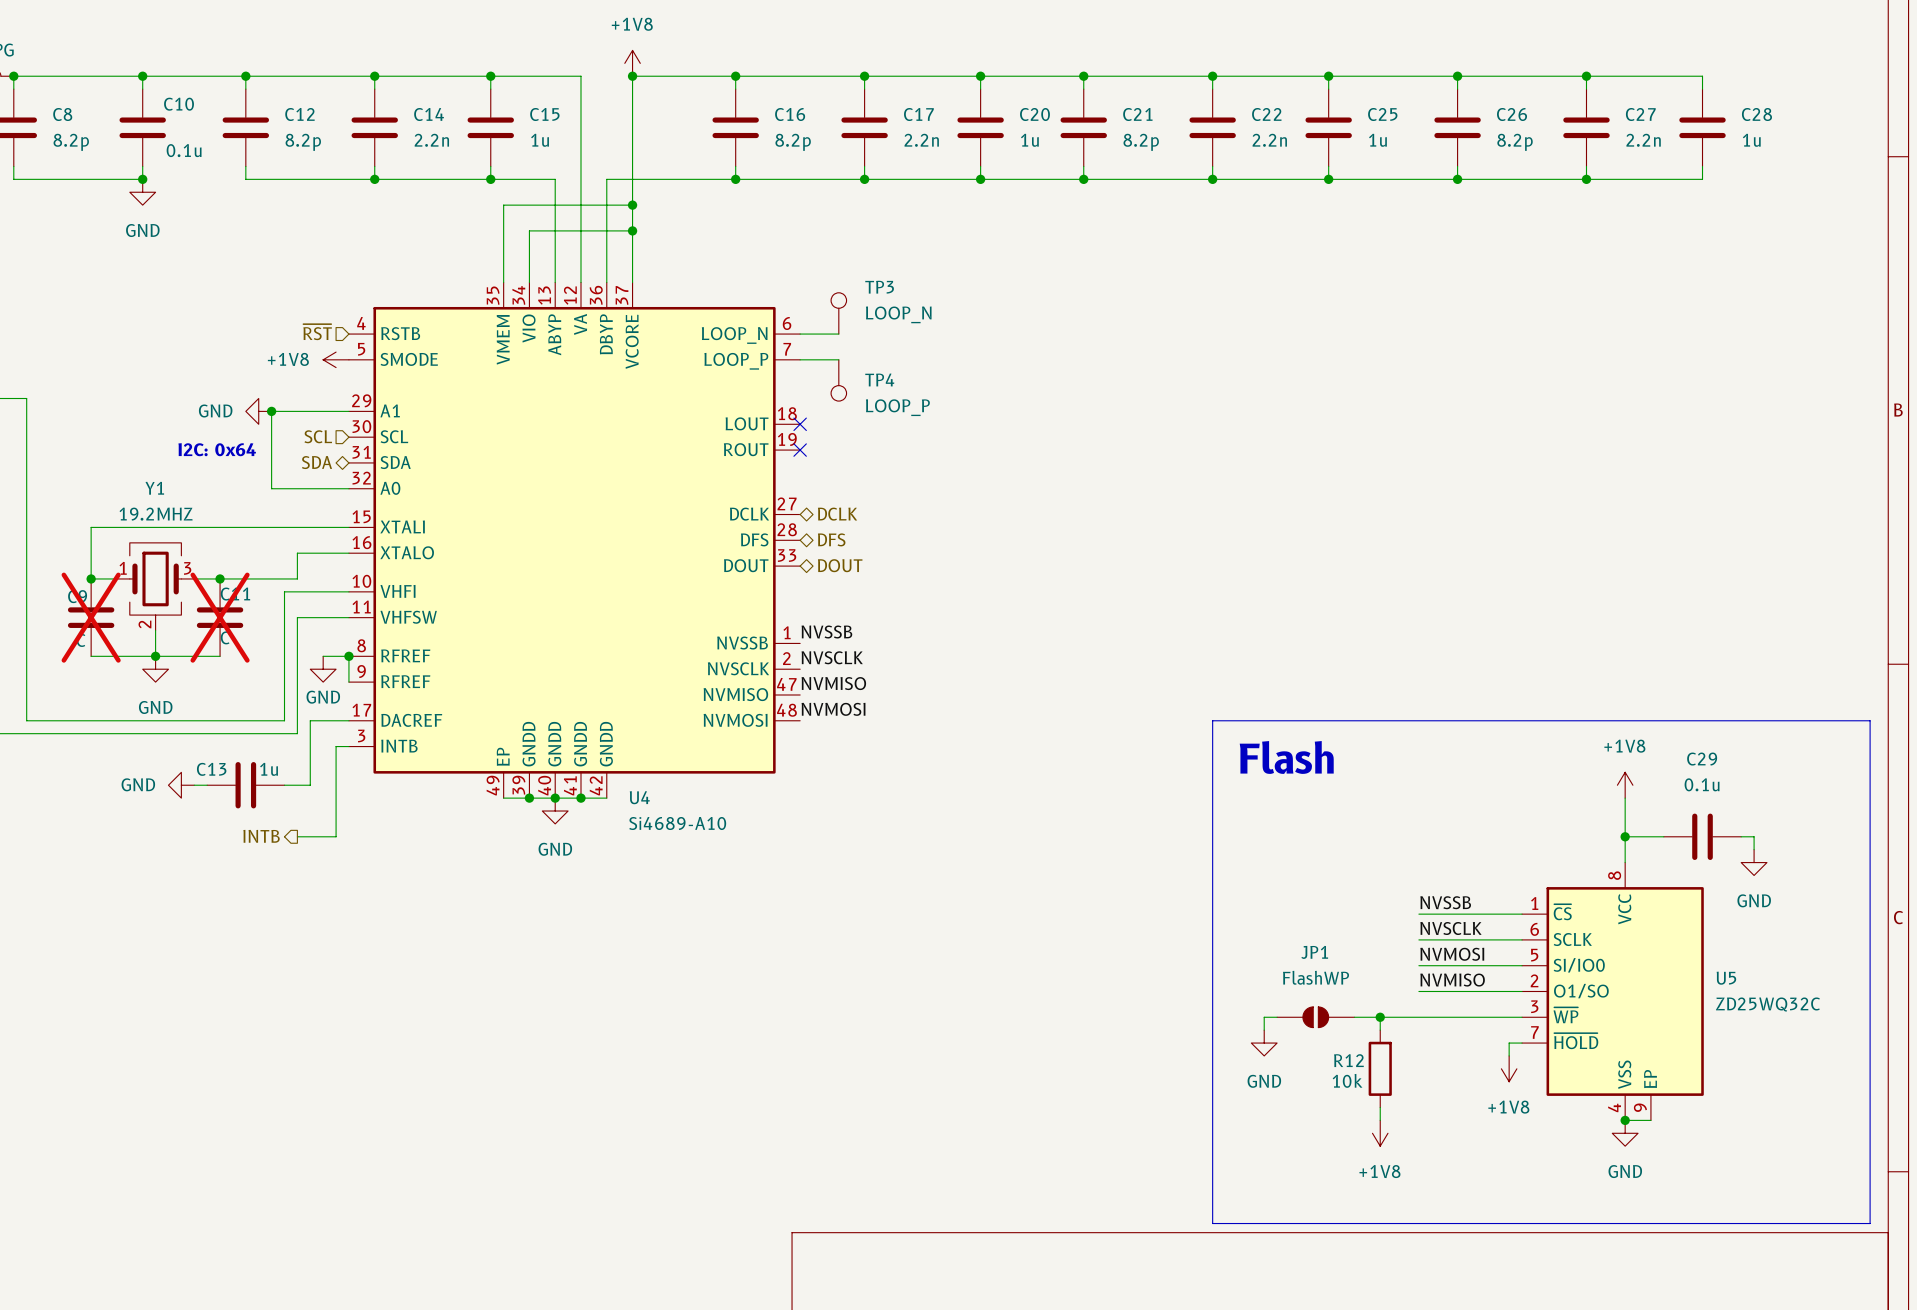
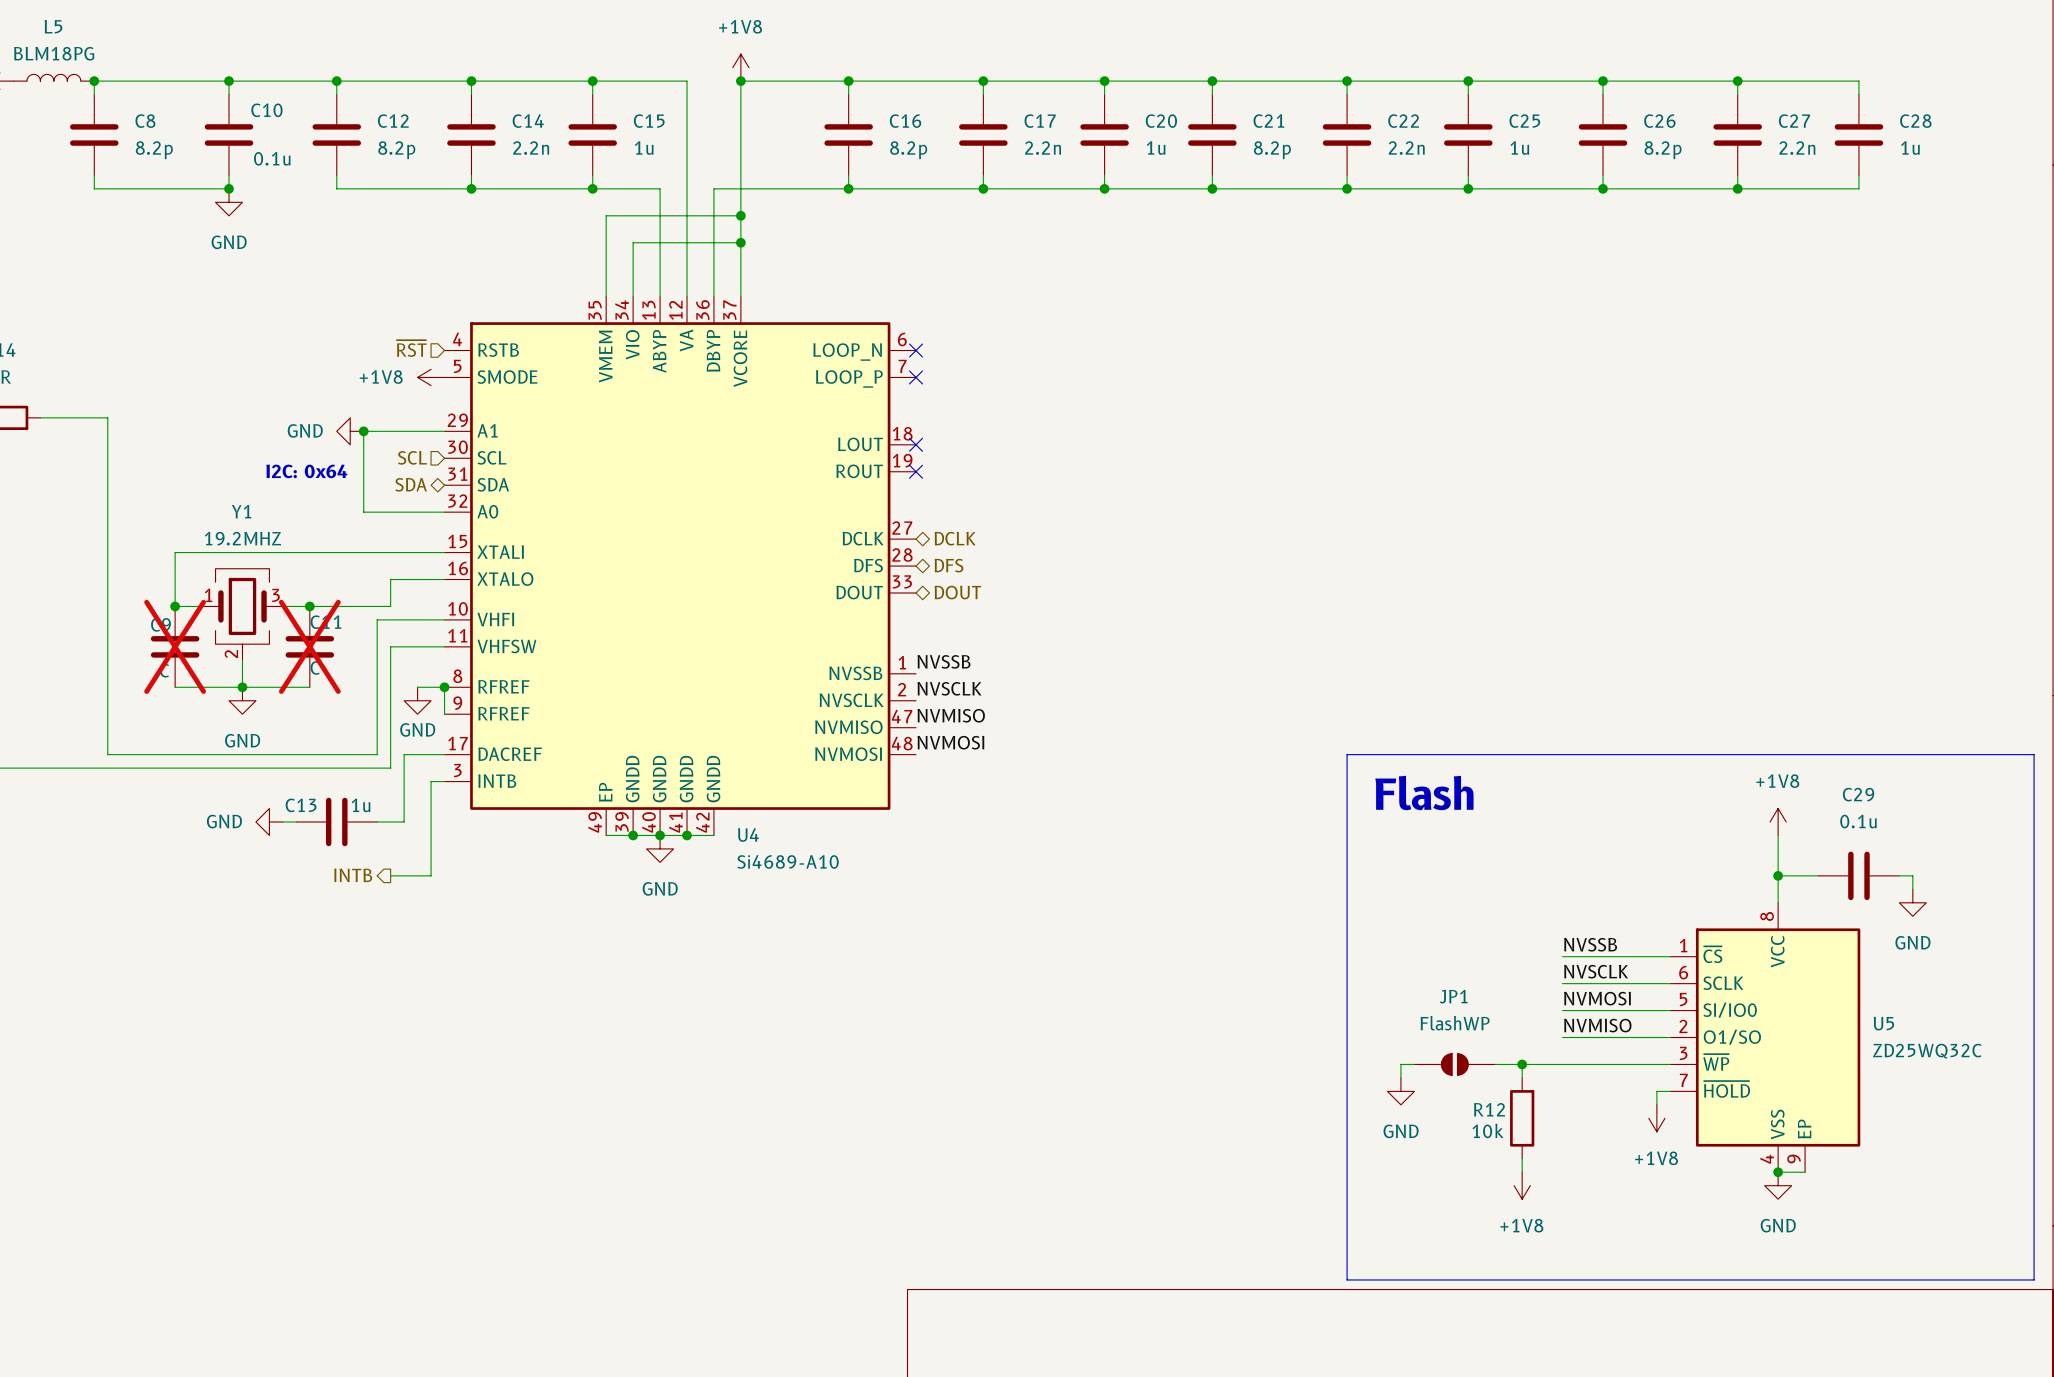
TP3: LOOP_N (838, 313) -> none
wire: (800, 334) (838, 334) -> none
no-connect mark: none -> (916, 350)
wire: (800, 359) (838, 359) -> none
no-connect mark: none -> (916, 377)
TP4: LOOP_P (838, 380) -> none

